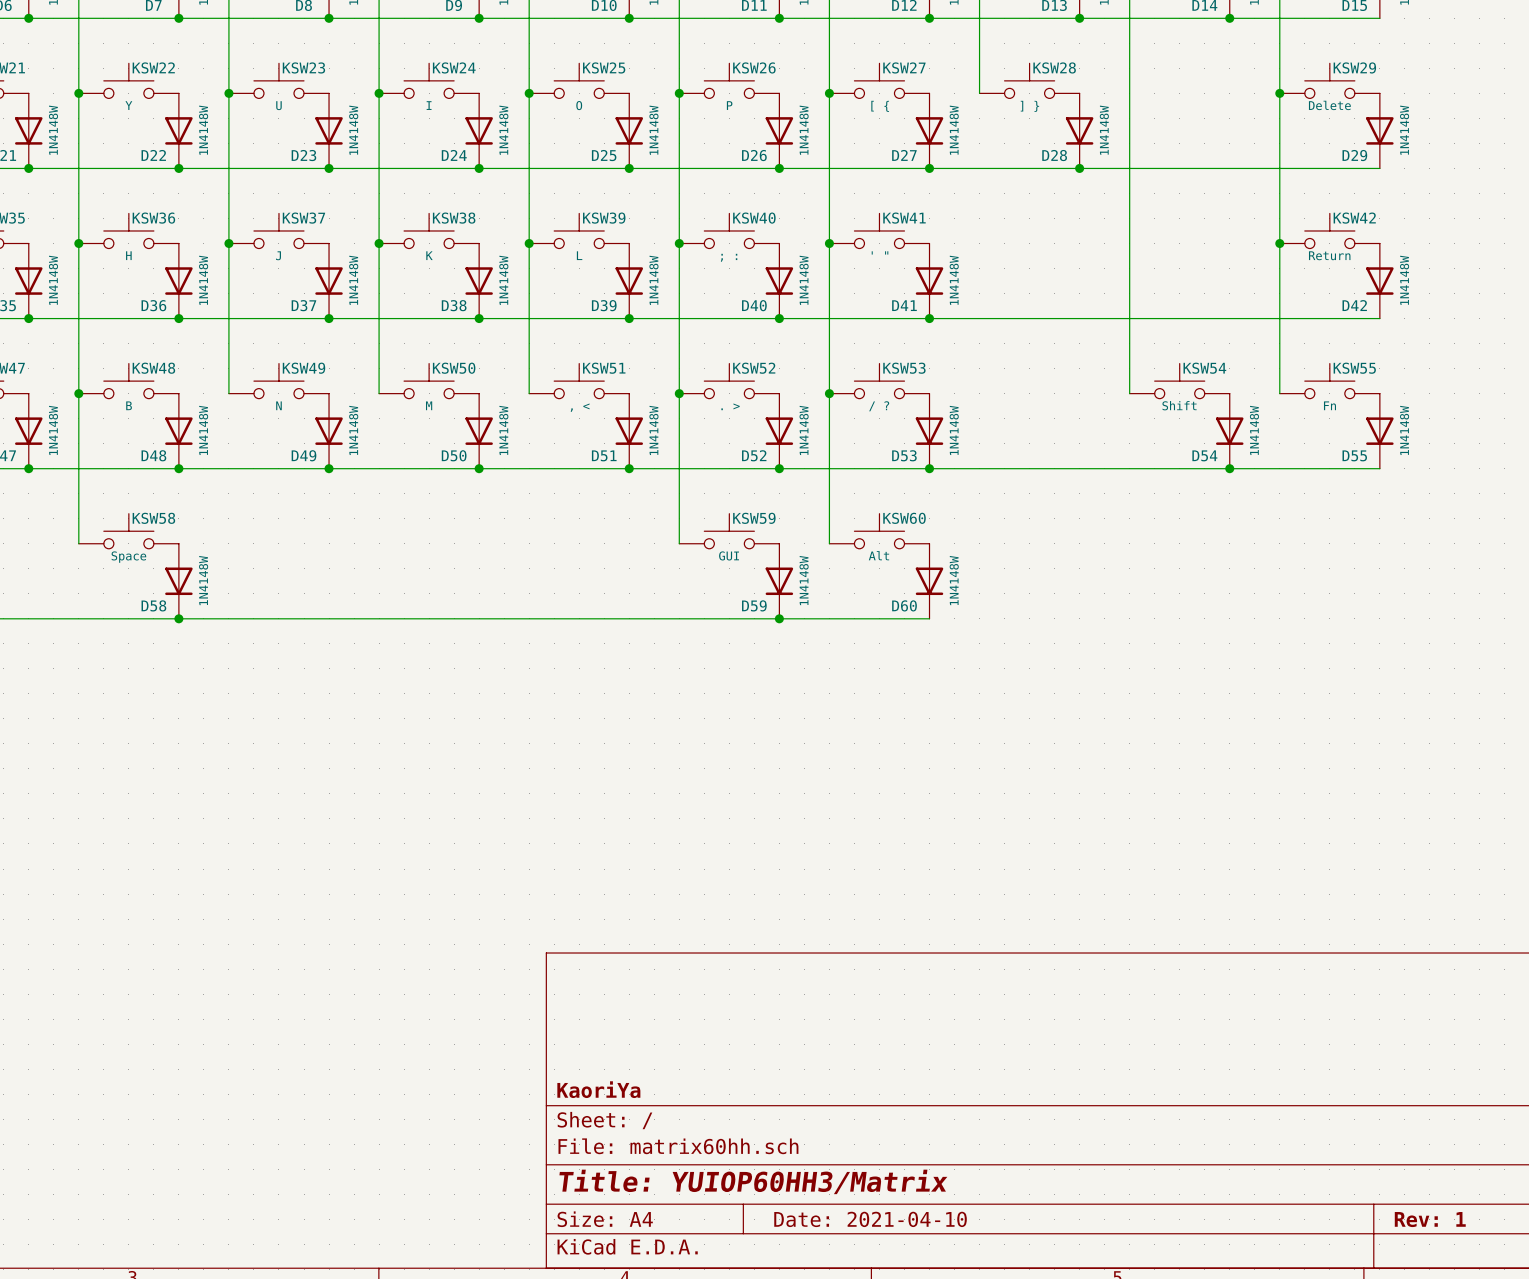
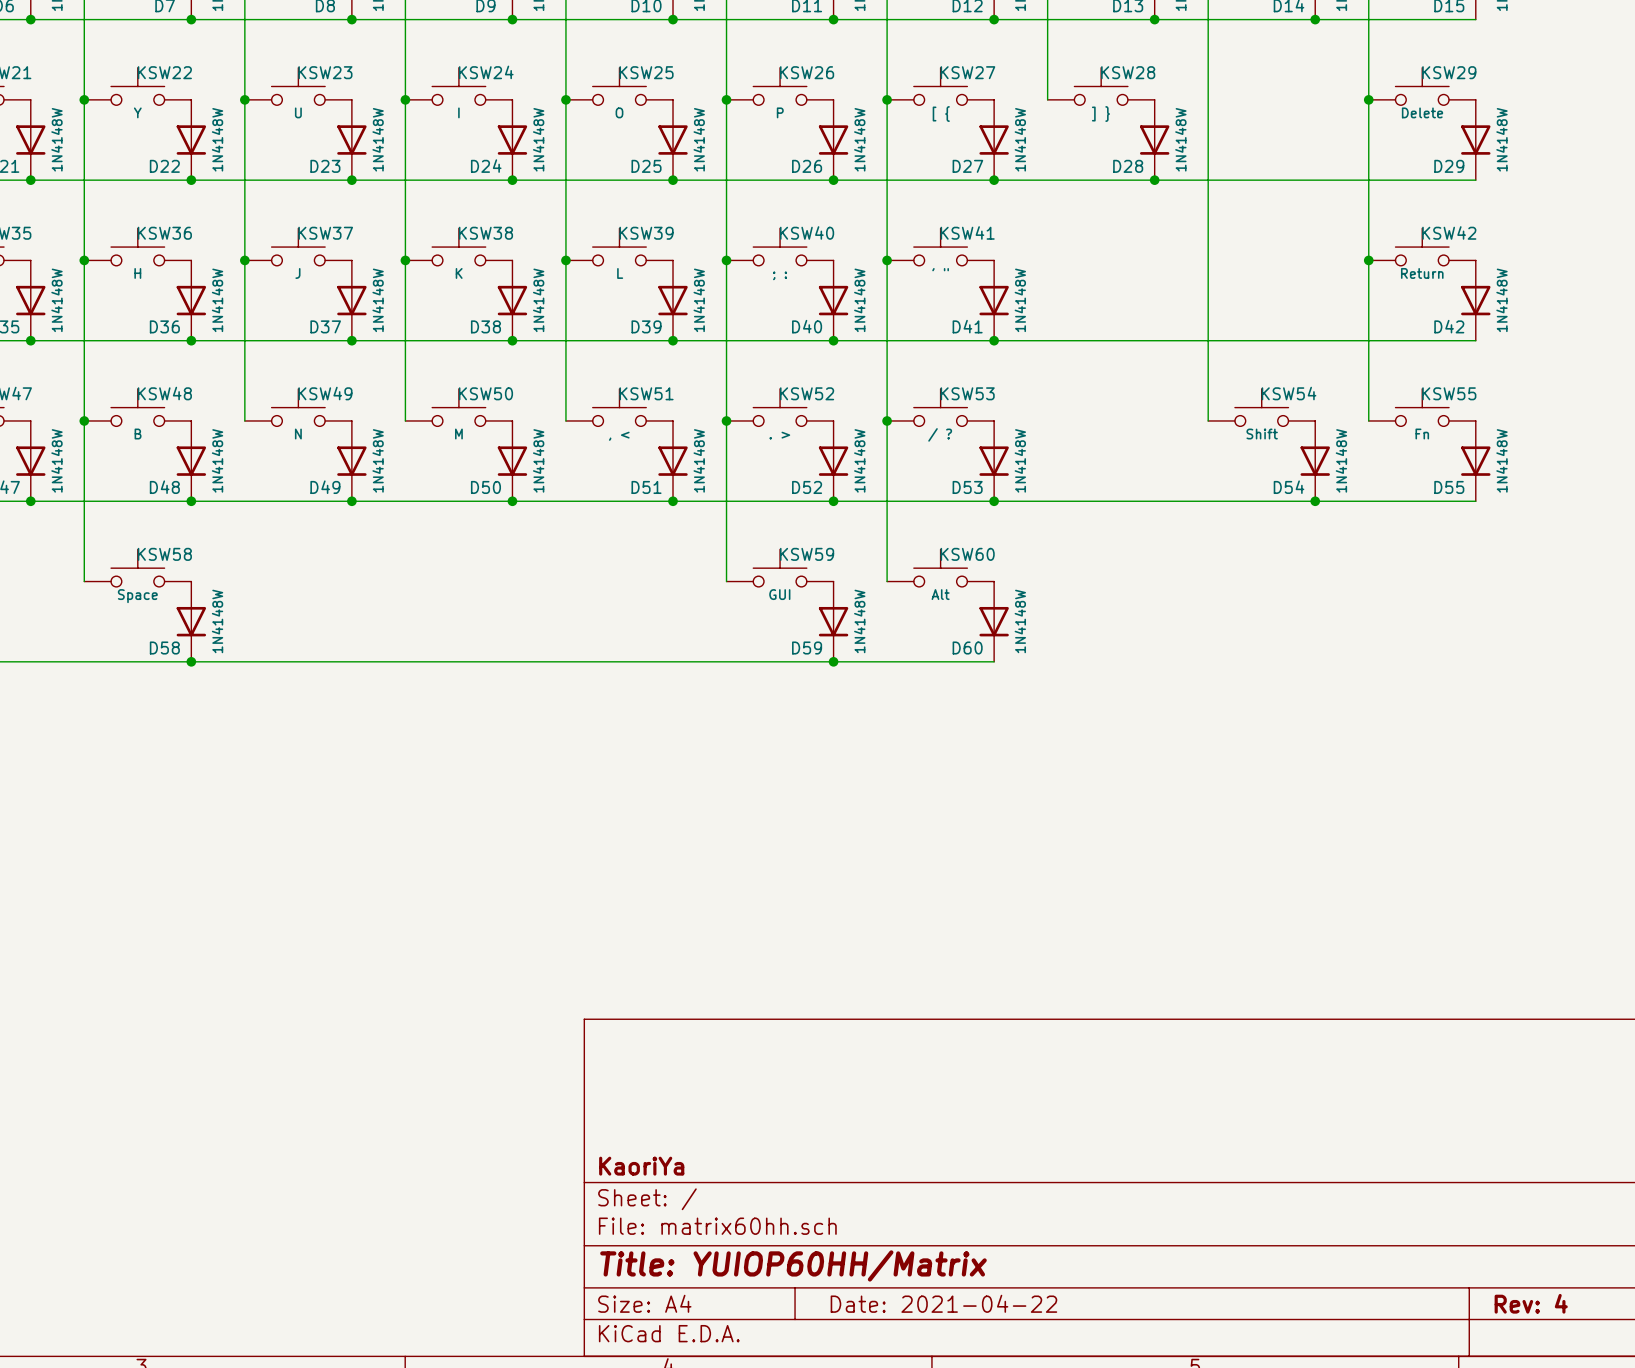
title block: Title: YUIOP60HH3/Matrix (753, 1181) -> Title: YUIOP60HH/Matrix (793, 1265)
title block: Date: 2021-04-10 (870, 1219) -> Date: 2021-04-22 (943, 1303)
title block: Rev: 1 (1430, 1219) -> Rev: 4 (1531, 1303)

